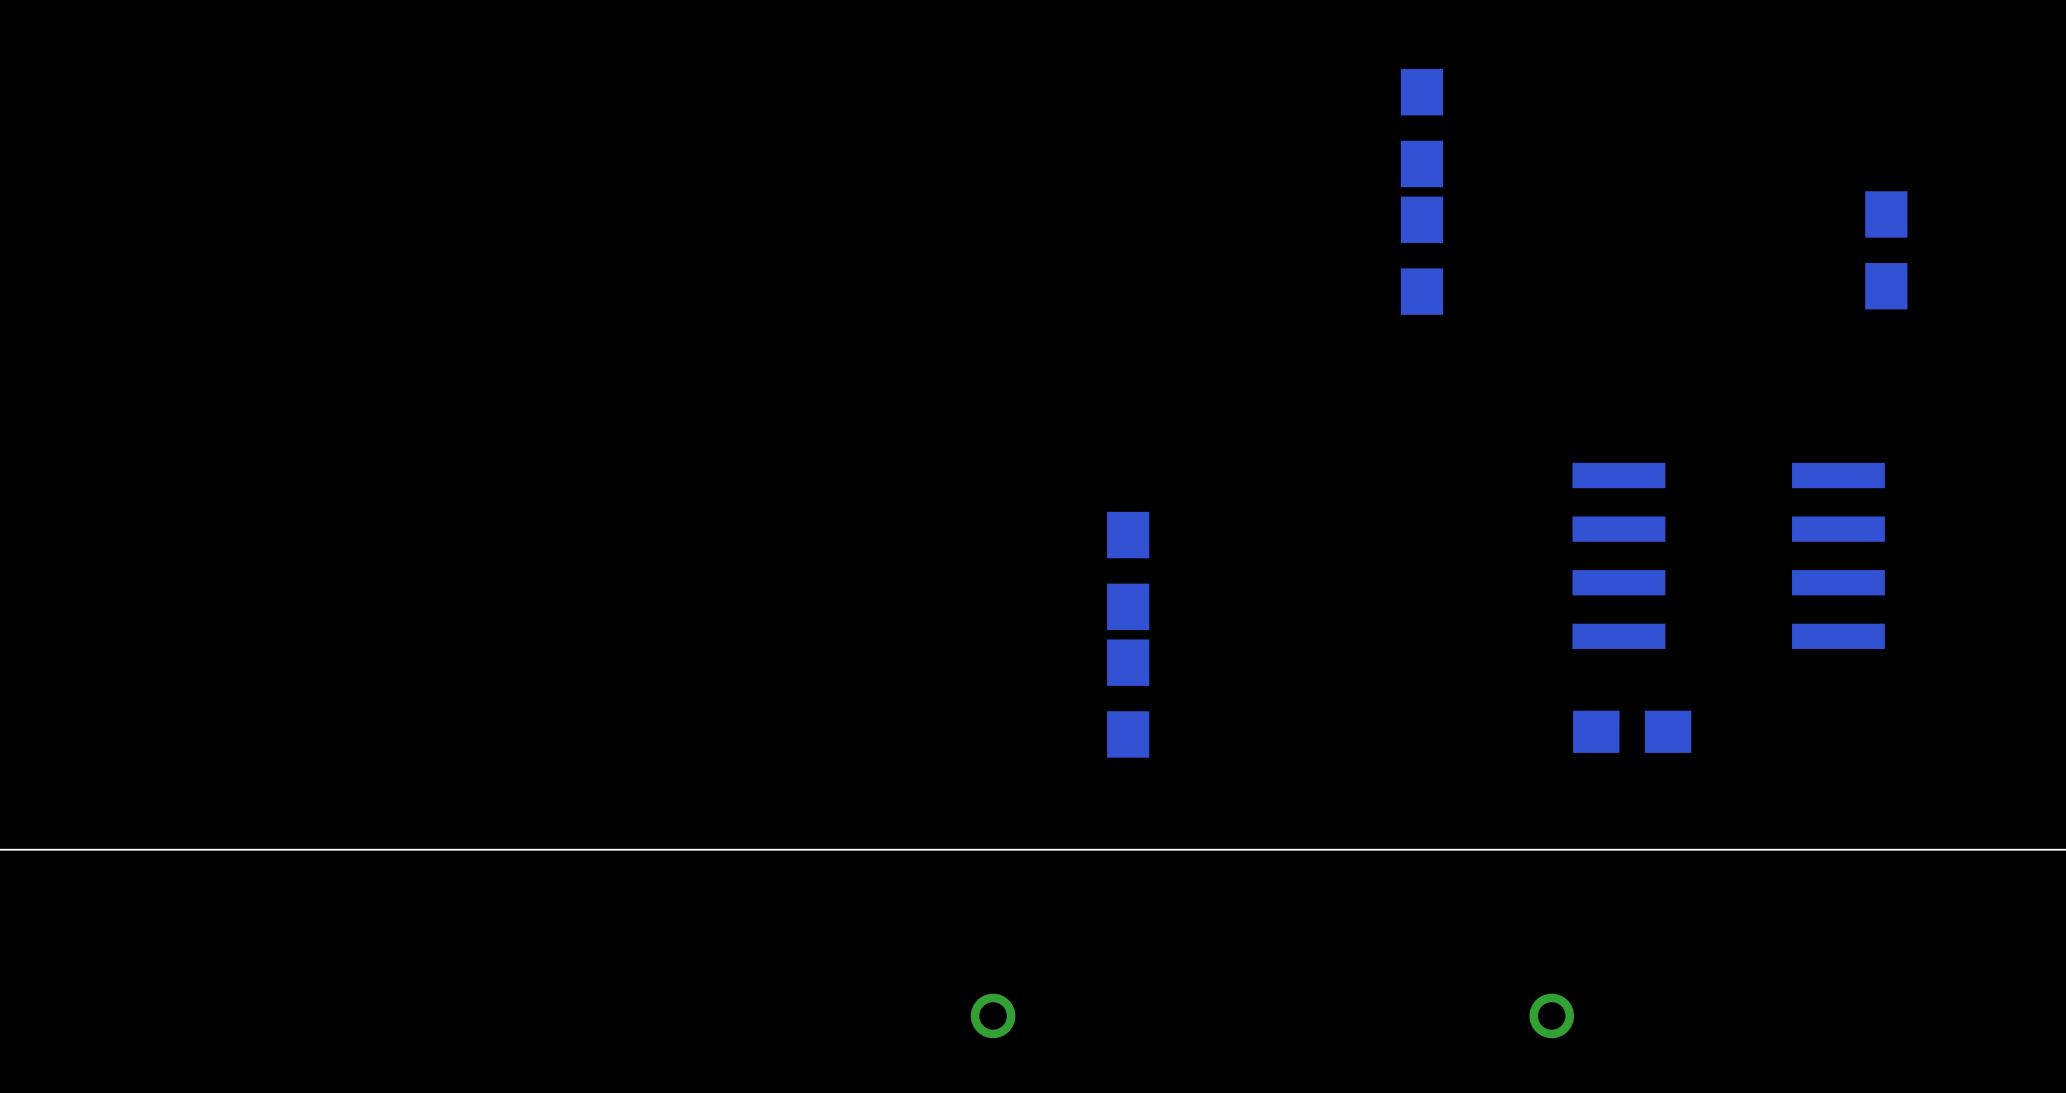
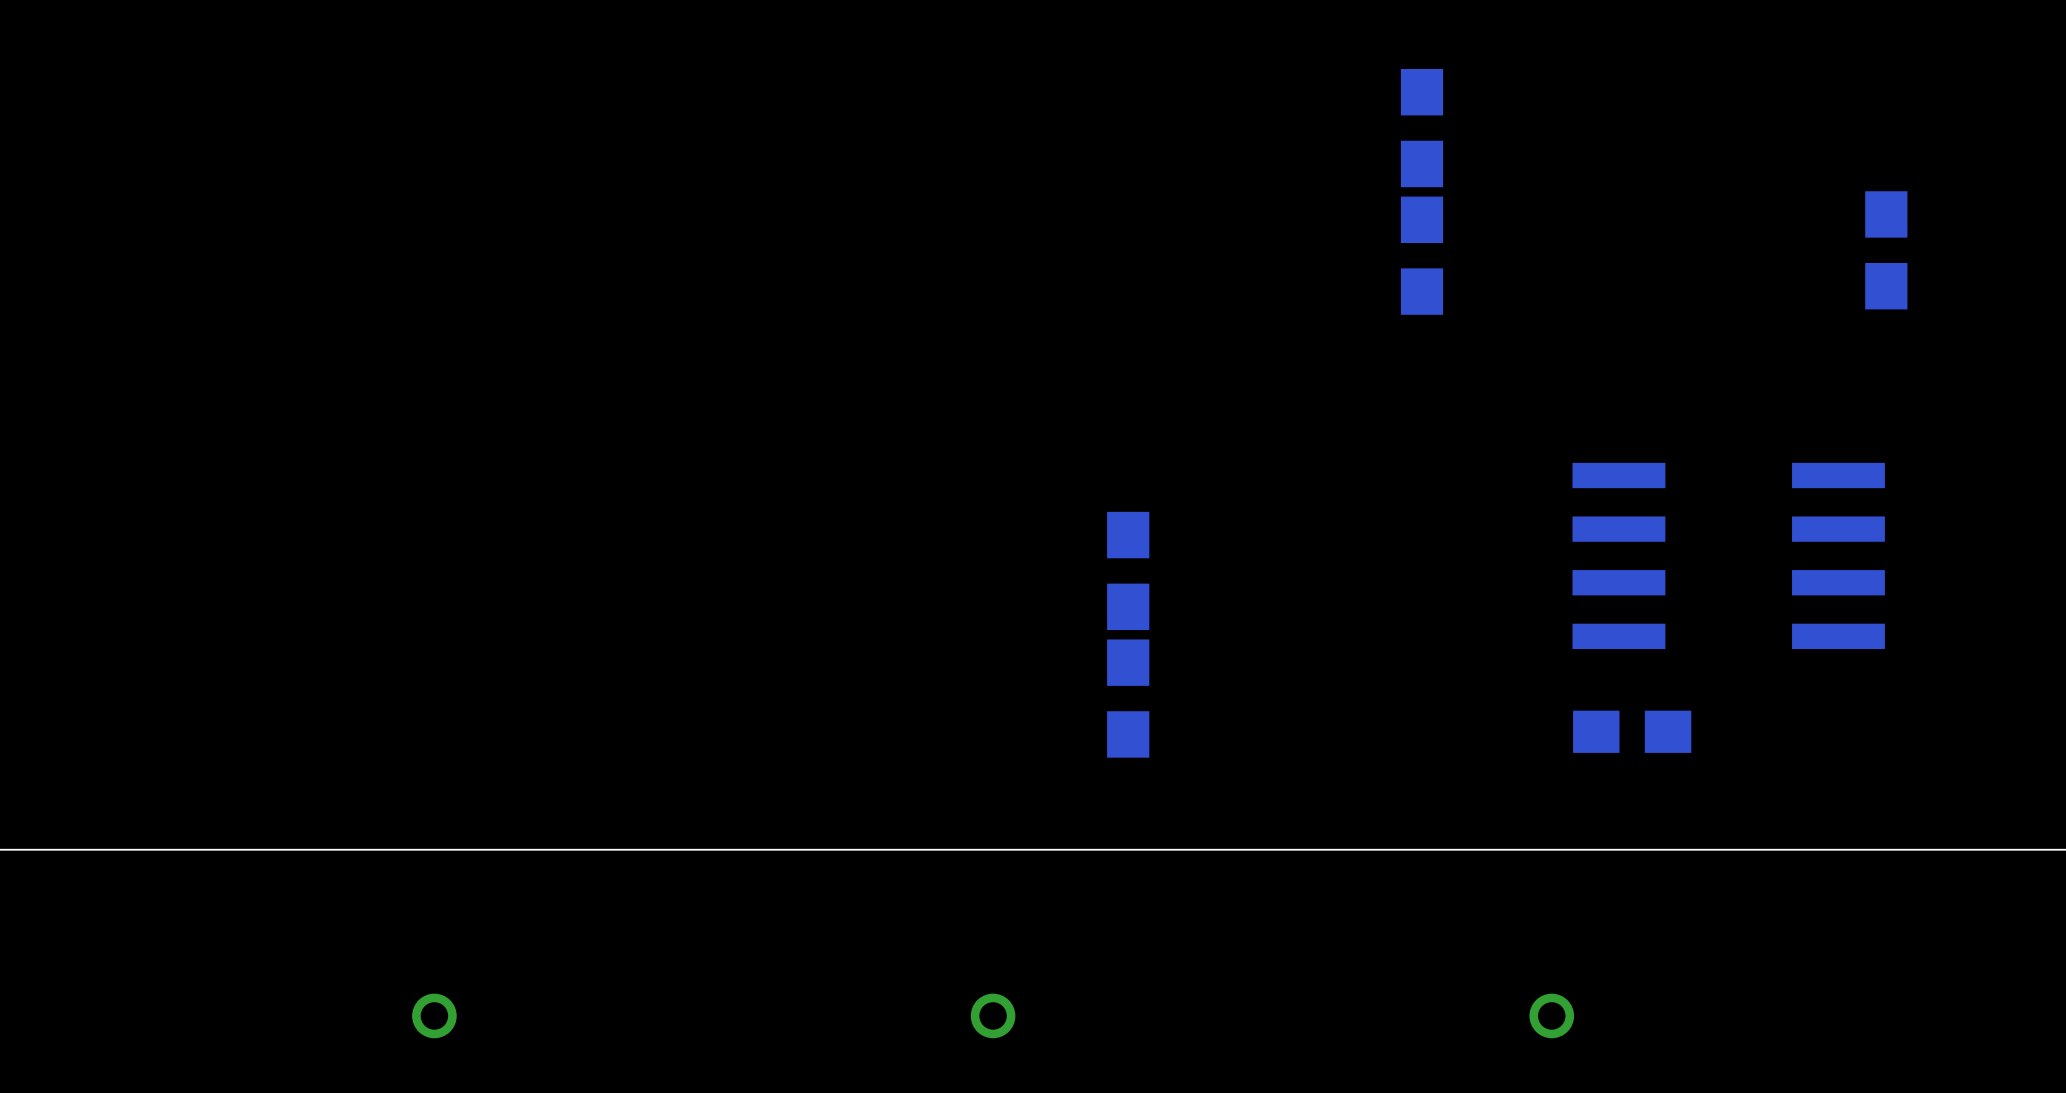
via: none -> (434, 1015)

